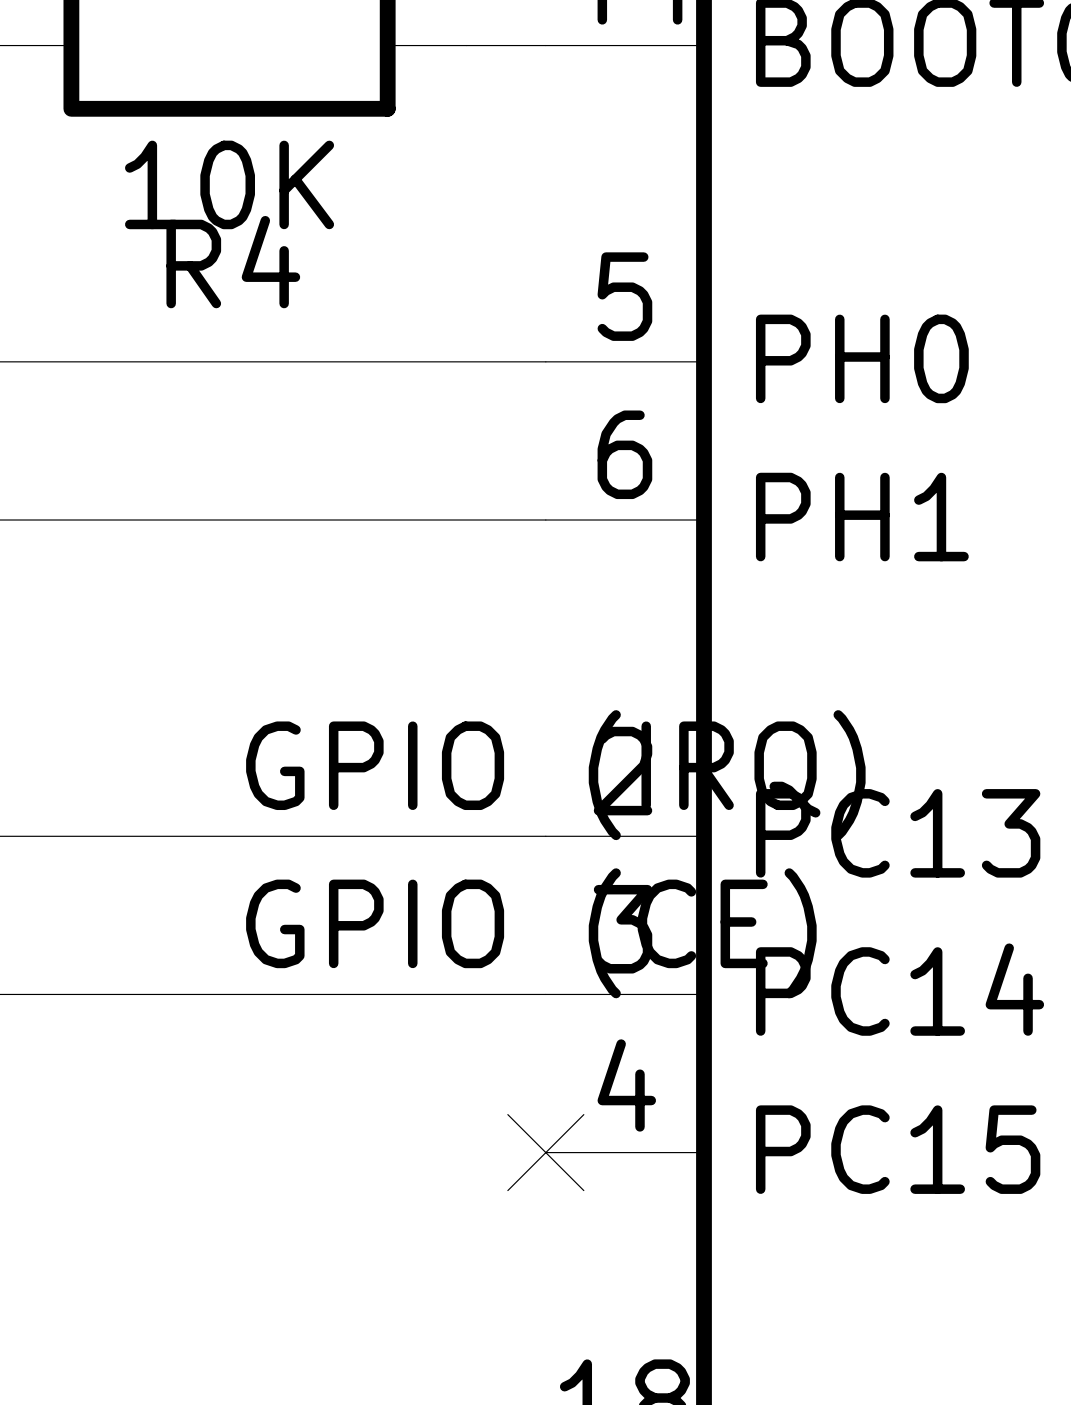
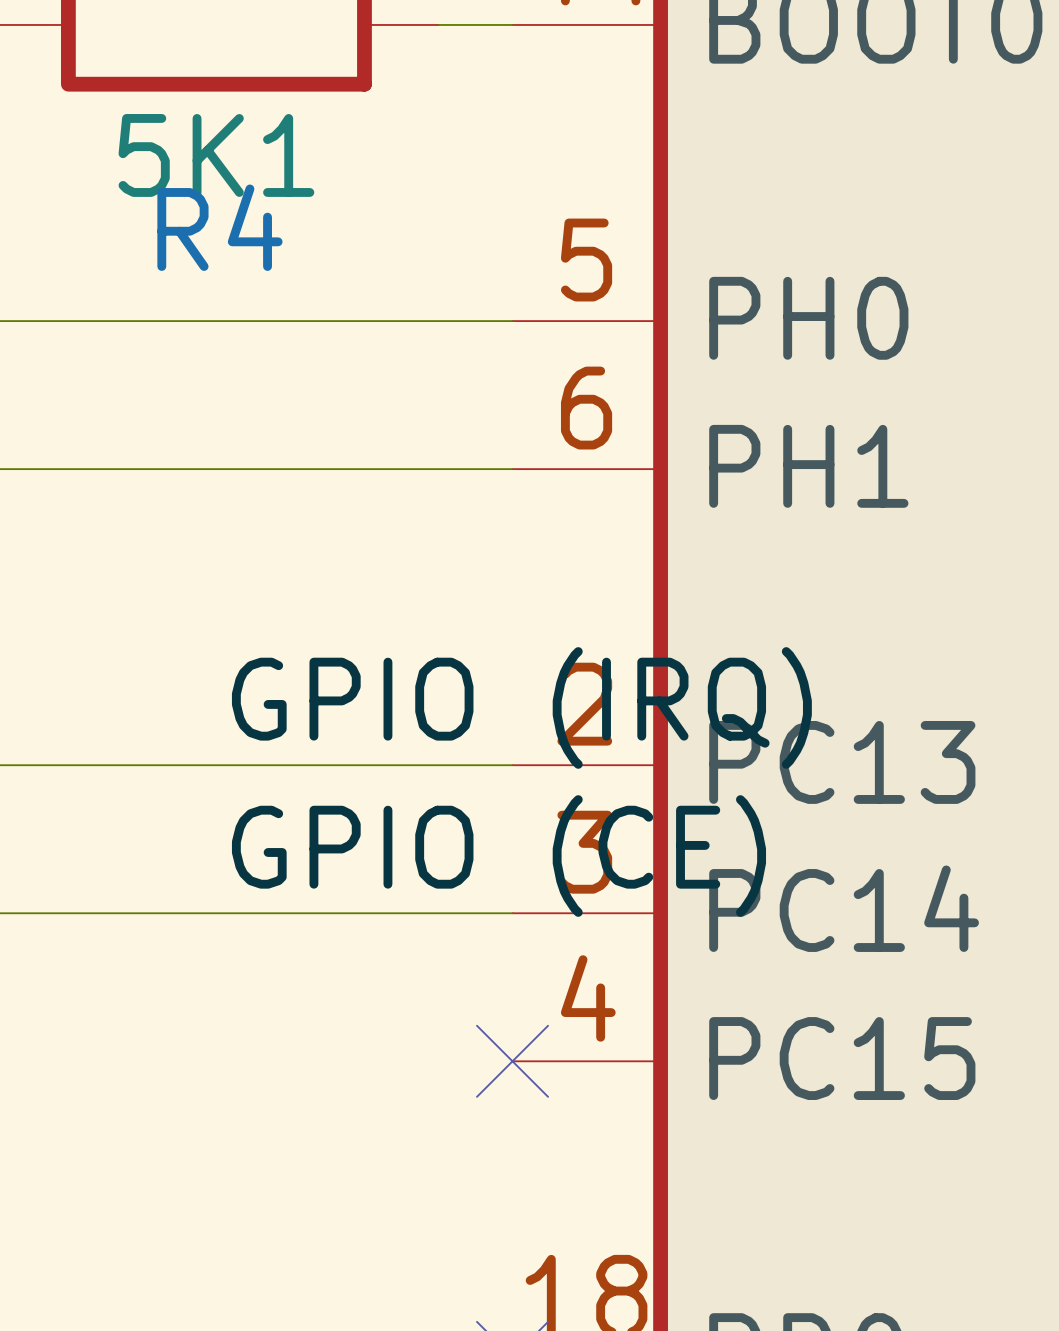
R4 value: 10K (229, 184) -> 5K1 (216, 155)

